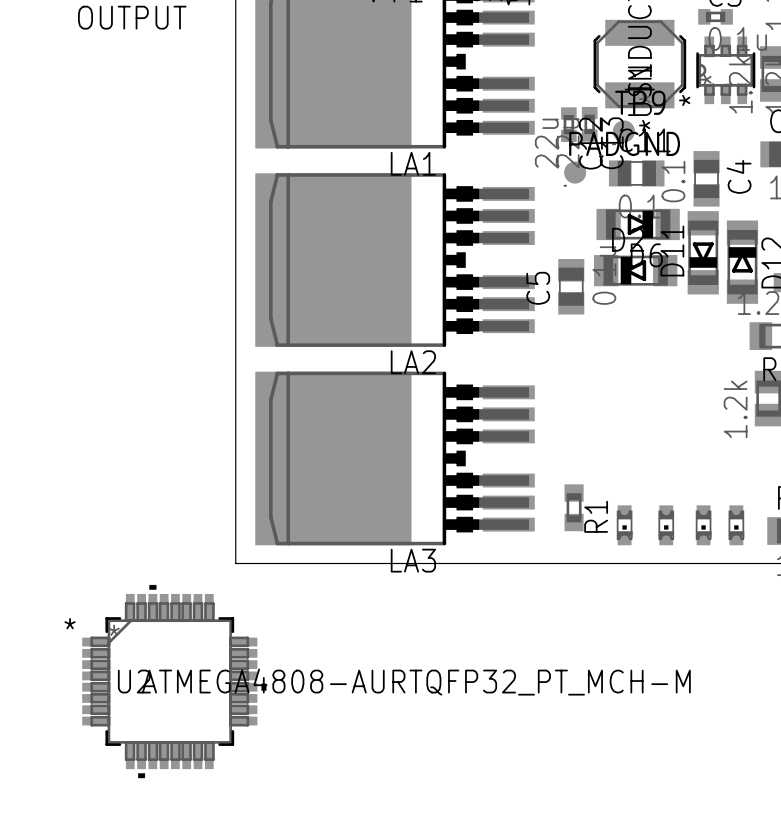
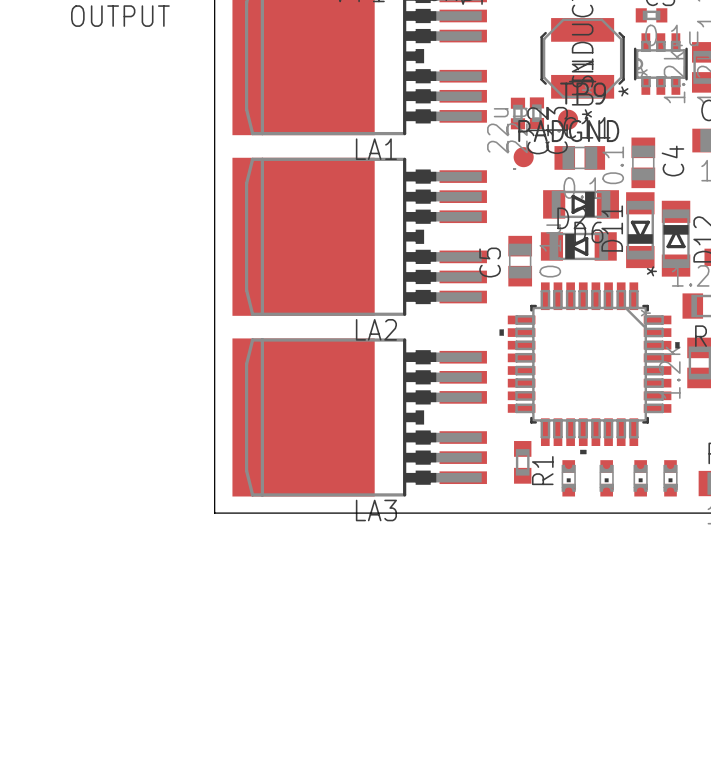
part: none -> (589, 368)
U2: ATMEGA4808-AURTQFP32_PT_MCH-M (174, 681) -> none

